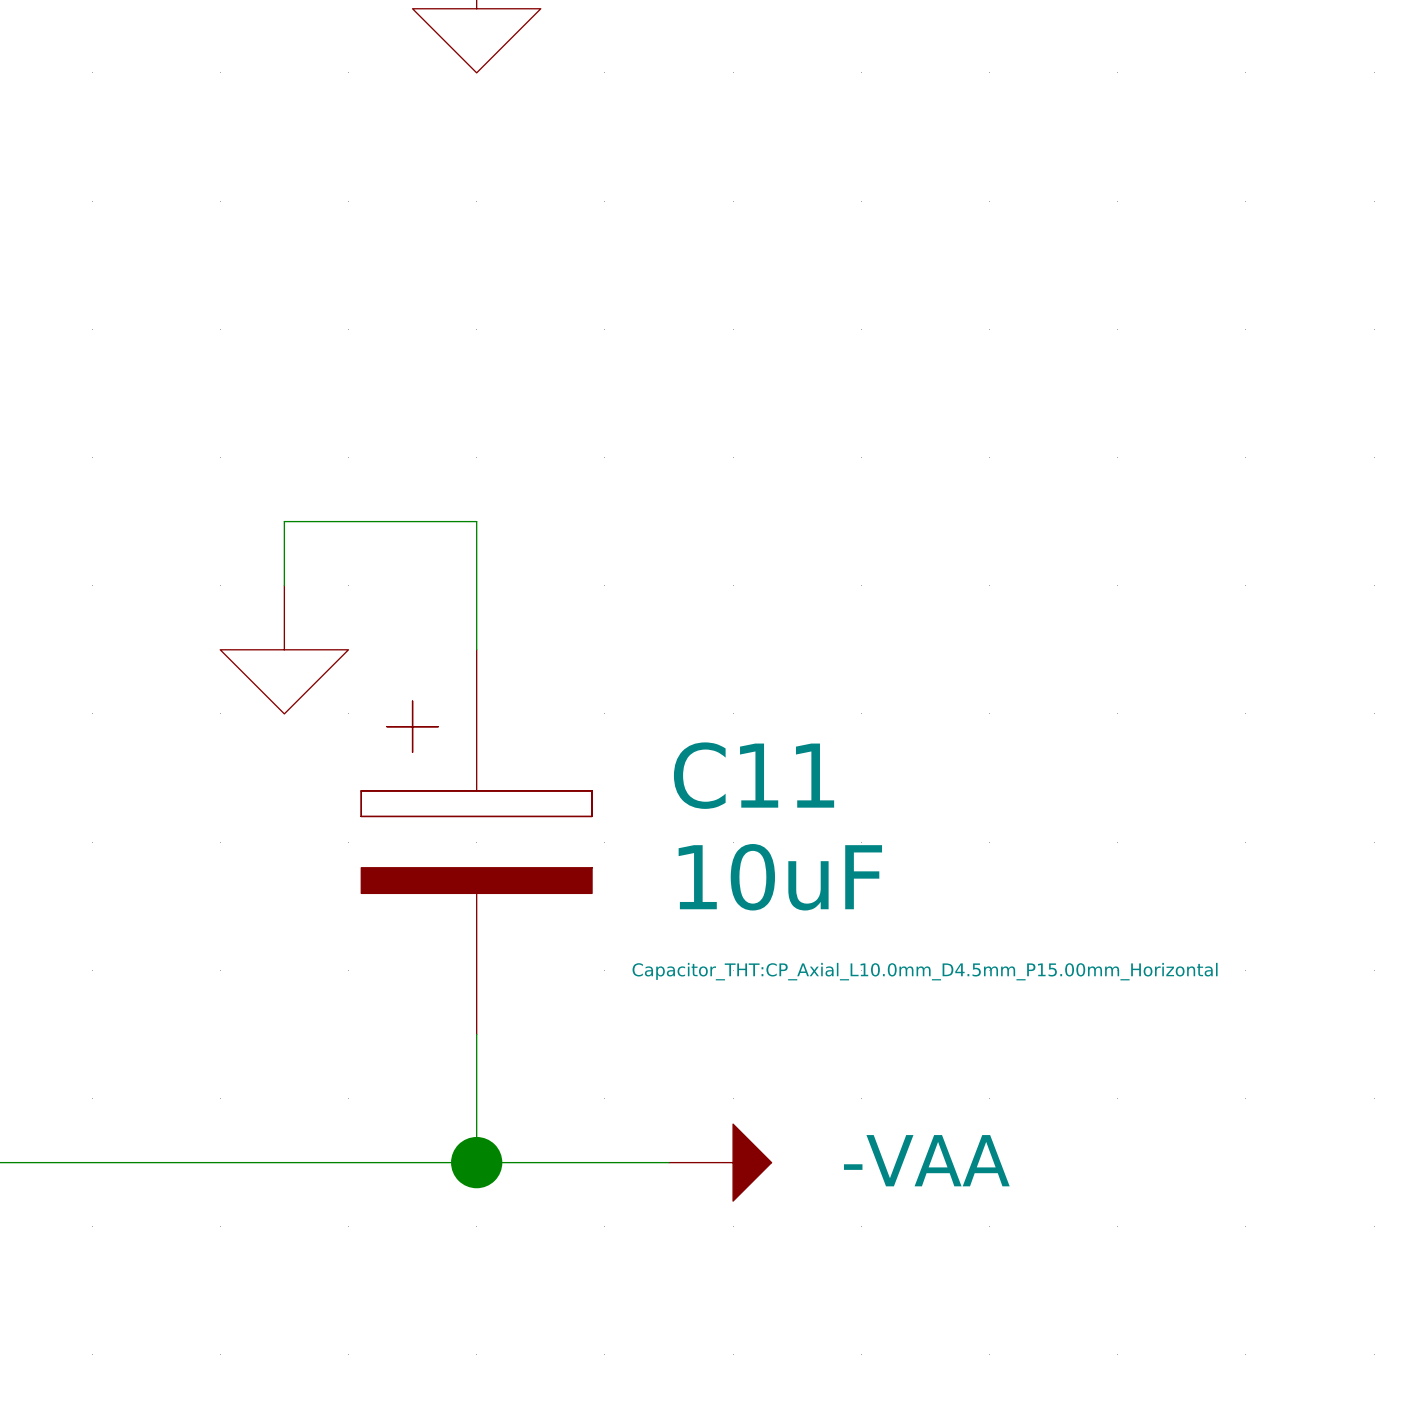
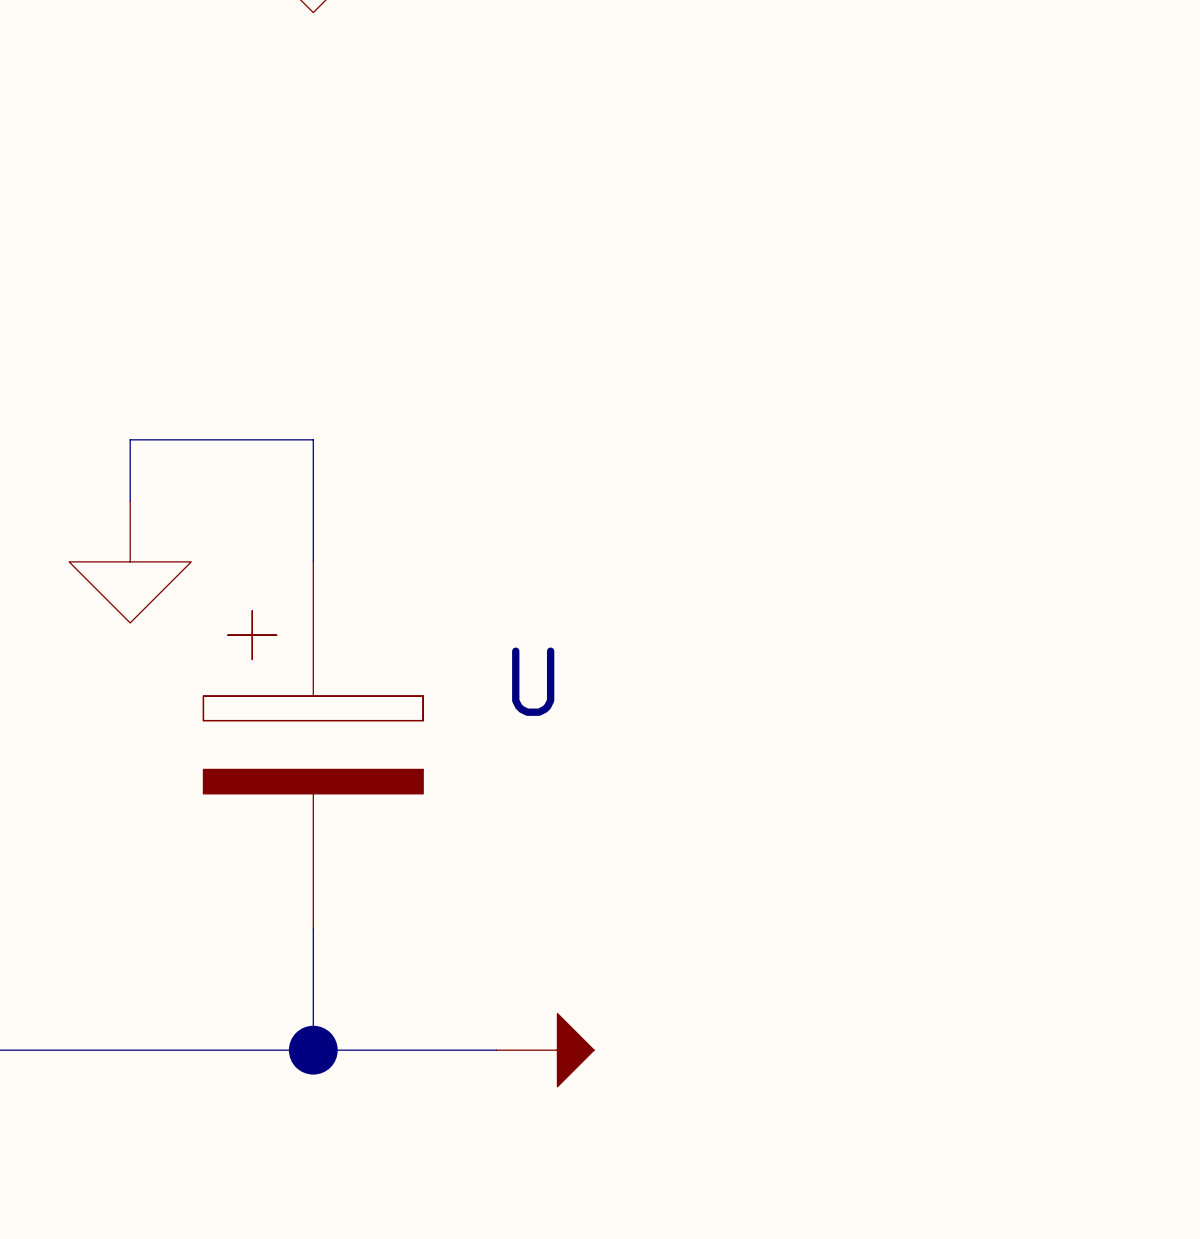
C11 name: C11 (754, 775) -> U (533, 681)
C11 value: 10uF (780, 877) -> none
C11 text: Capacitor_THT:CP_Axial_L10.0mm_D4.5mm_P15.00mm_Horizontal (925, 971) -> none
power symbol text: -VAA (926, 1160) -> none

